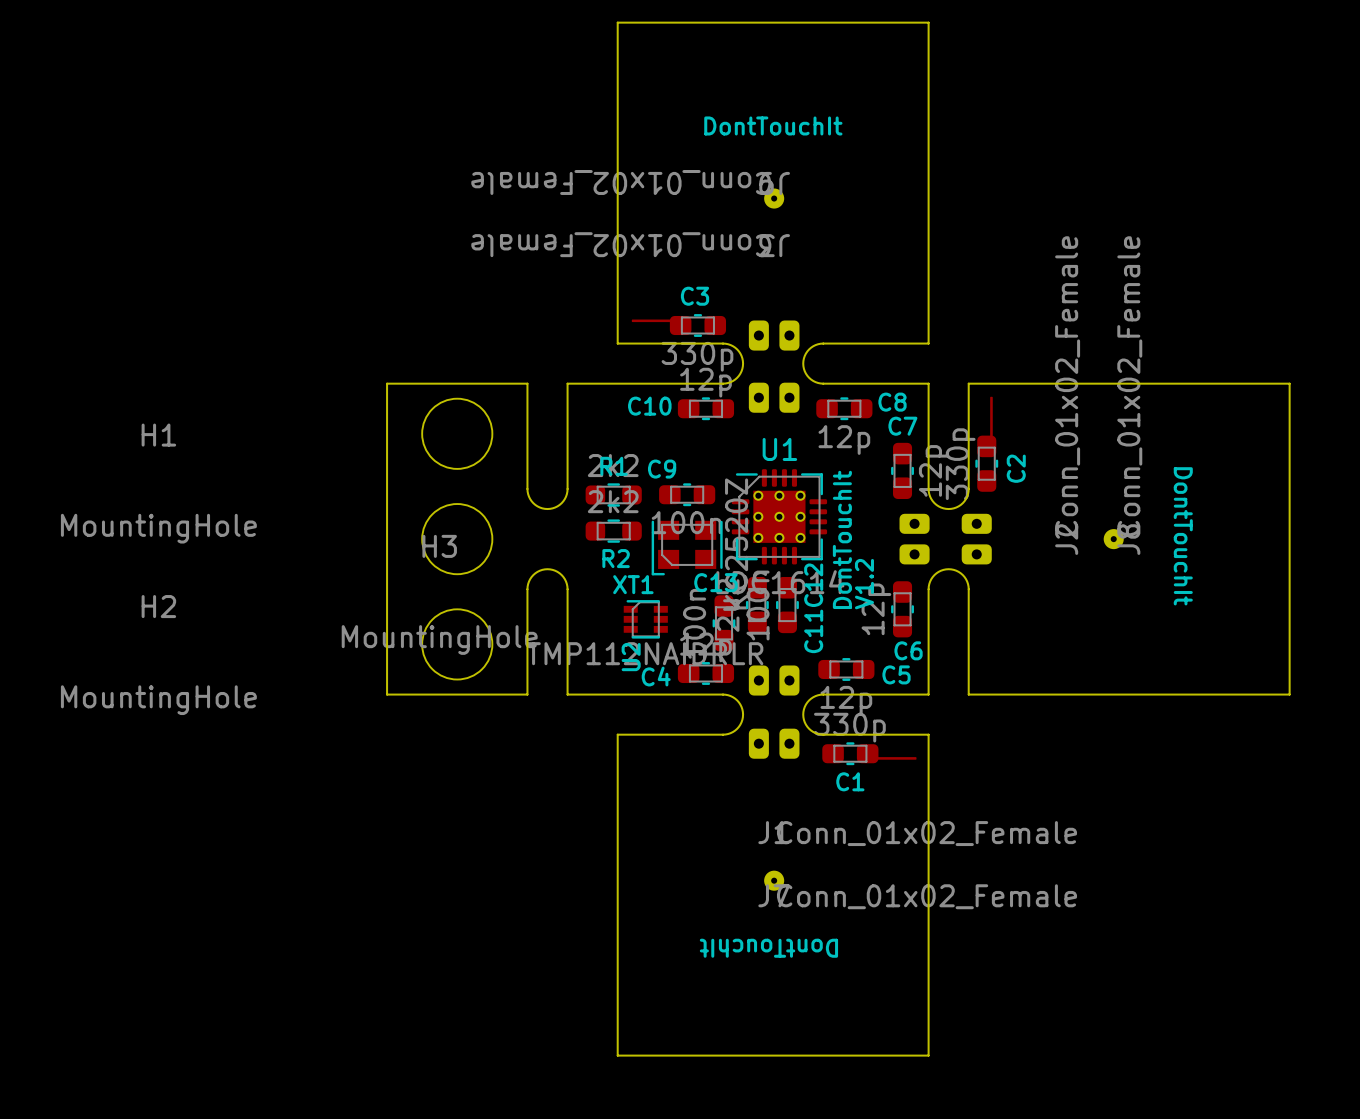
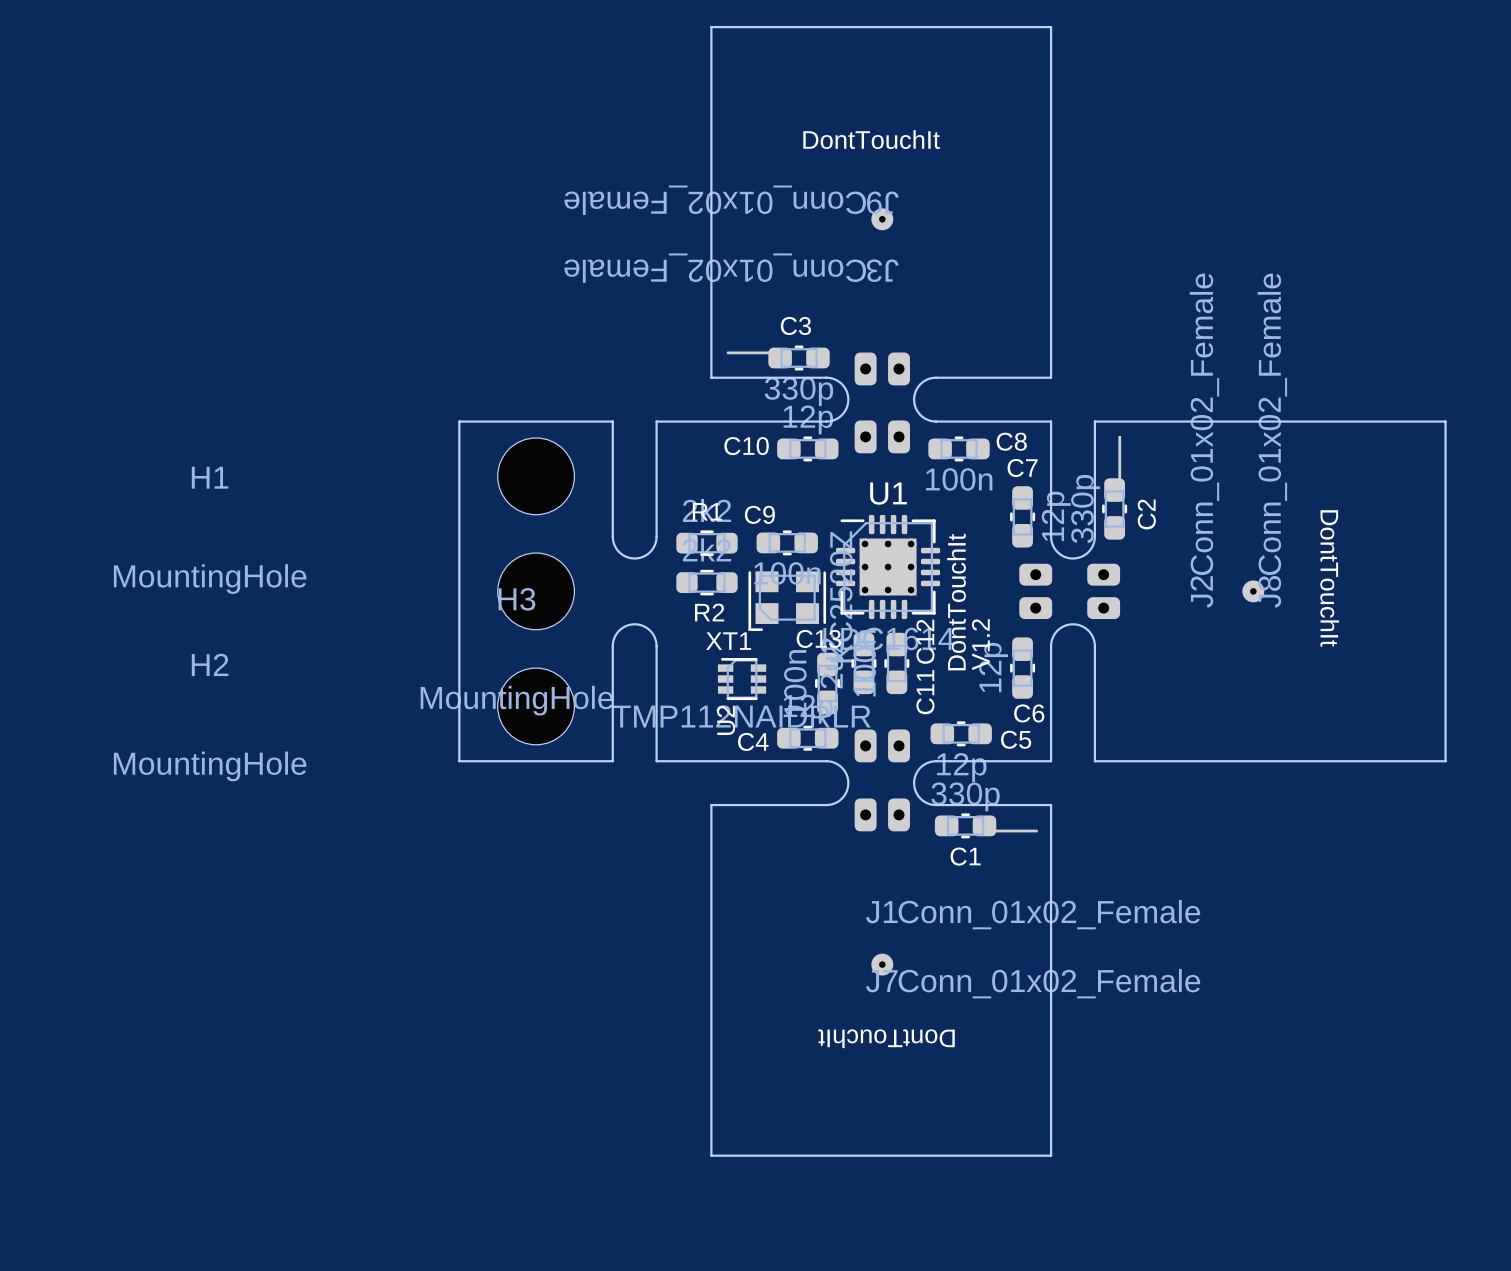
C8 value: 12p (844, 440) -> 100n (959, 479)

